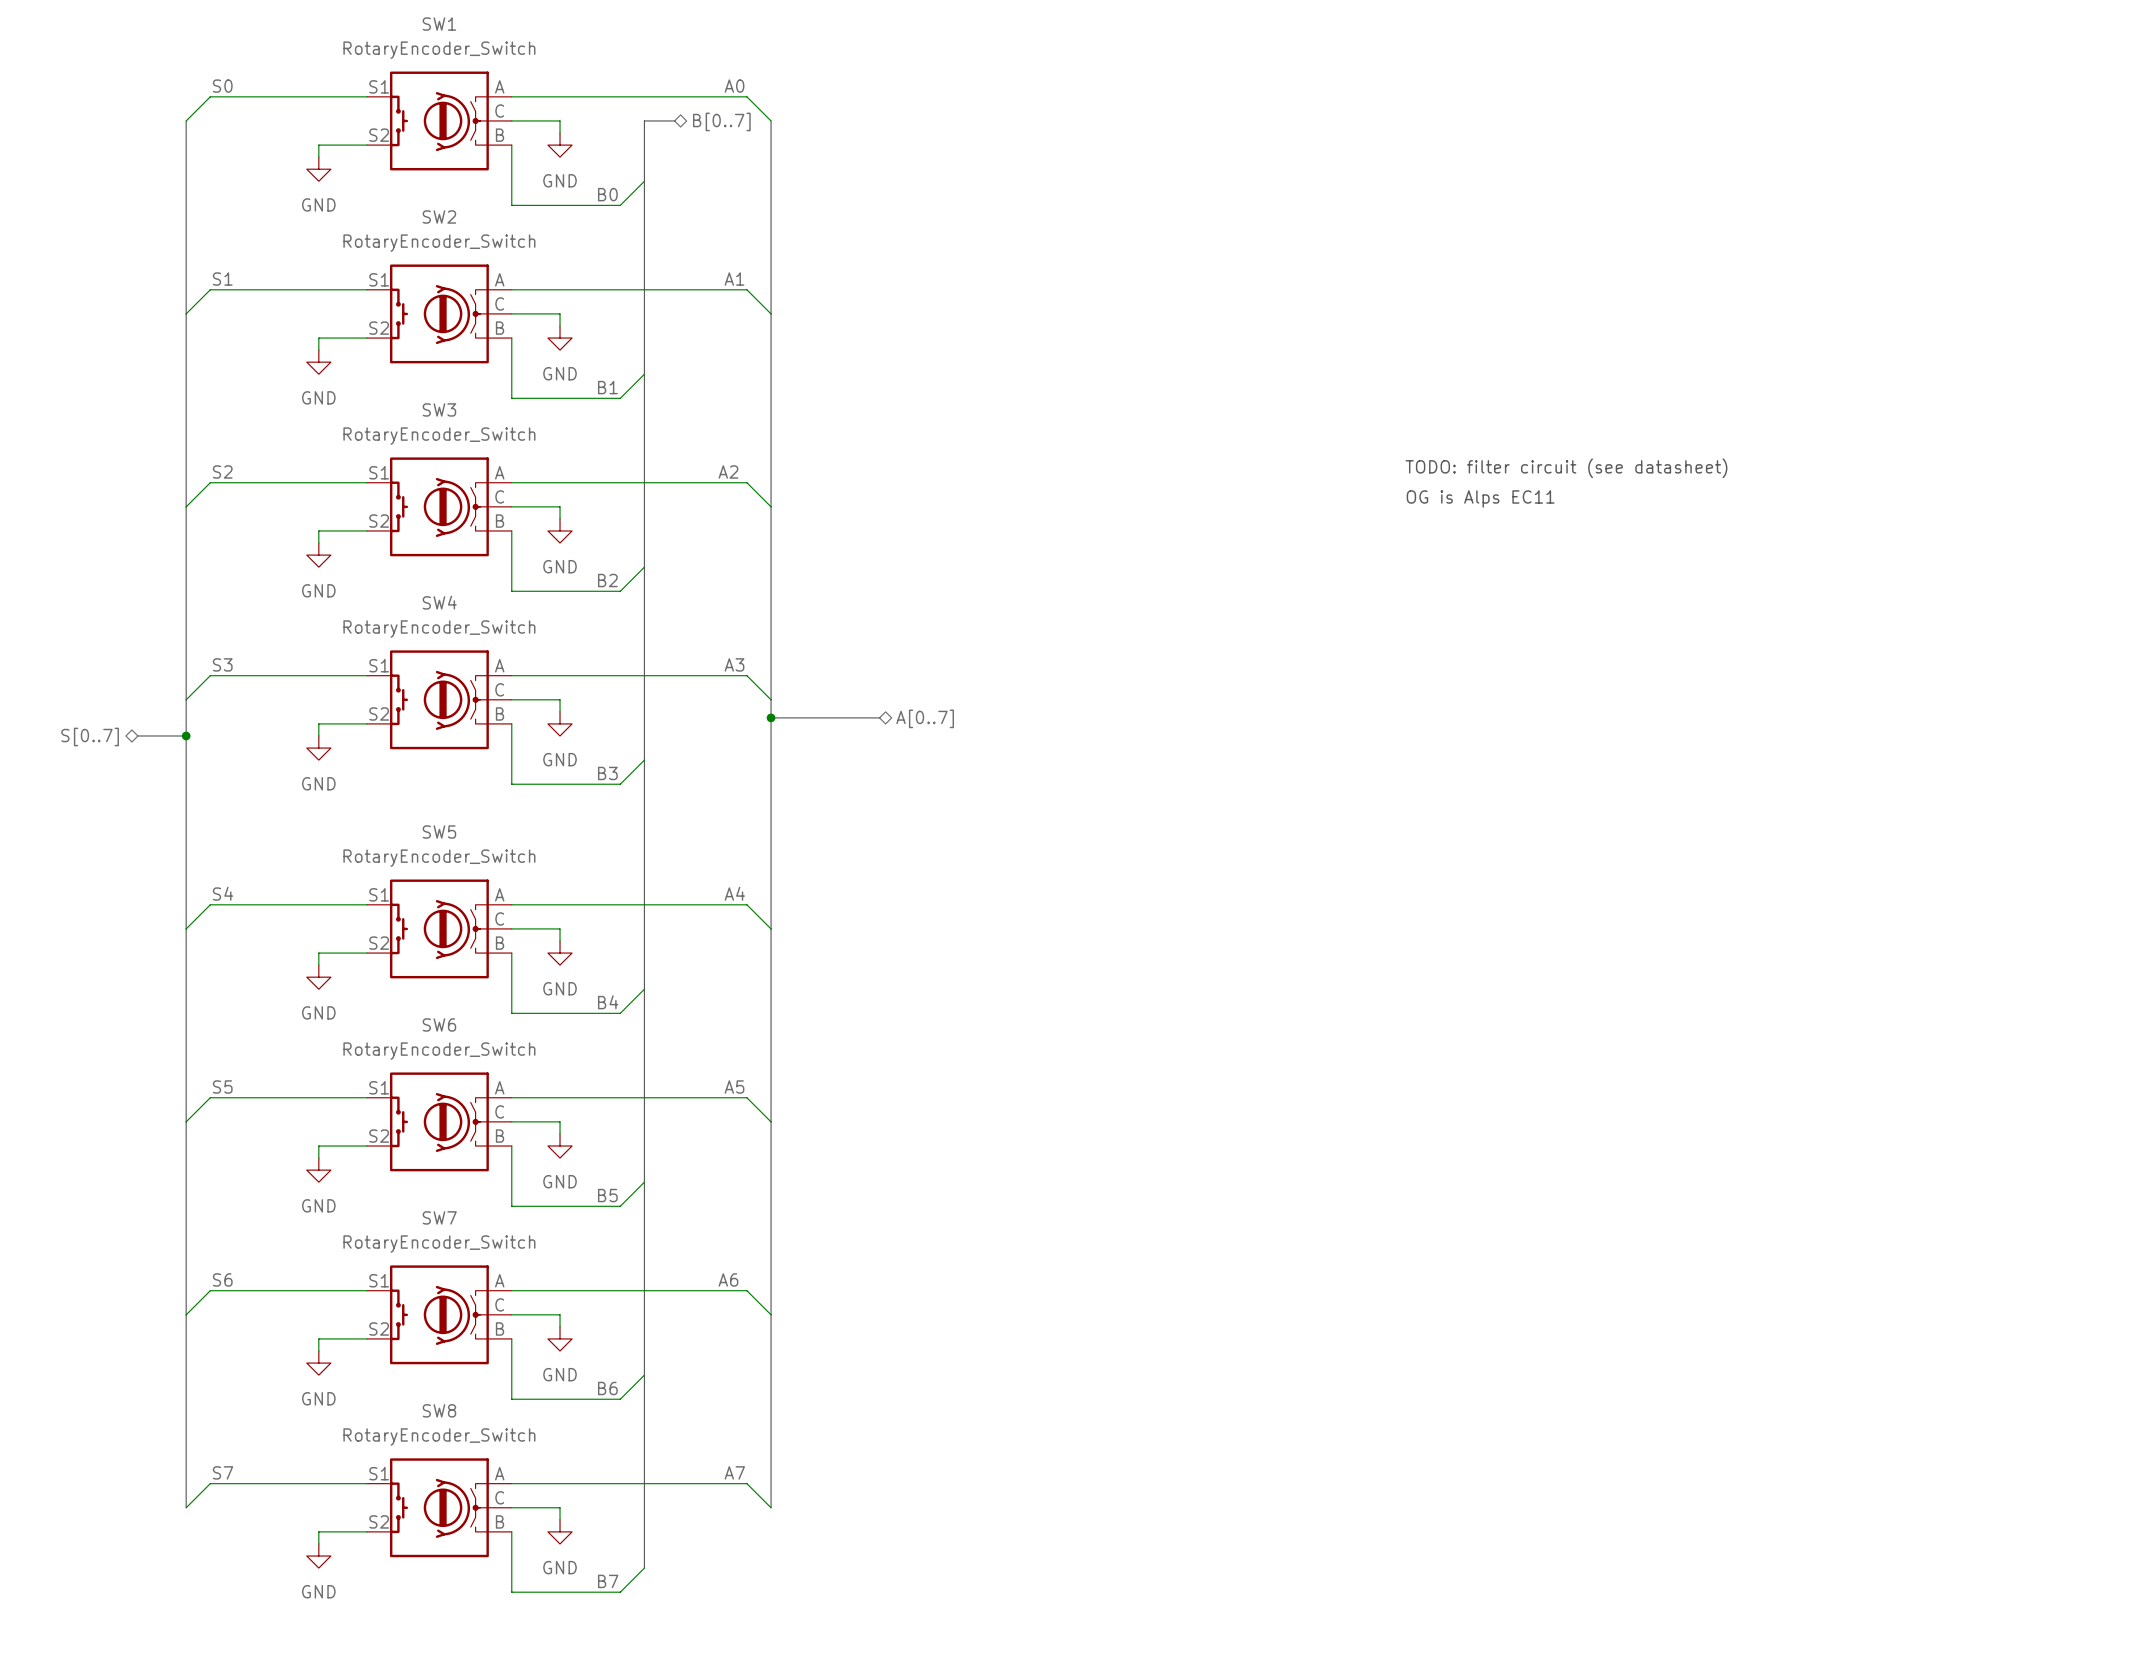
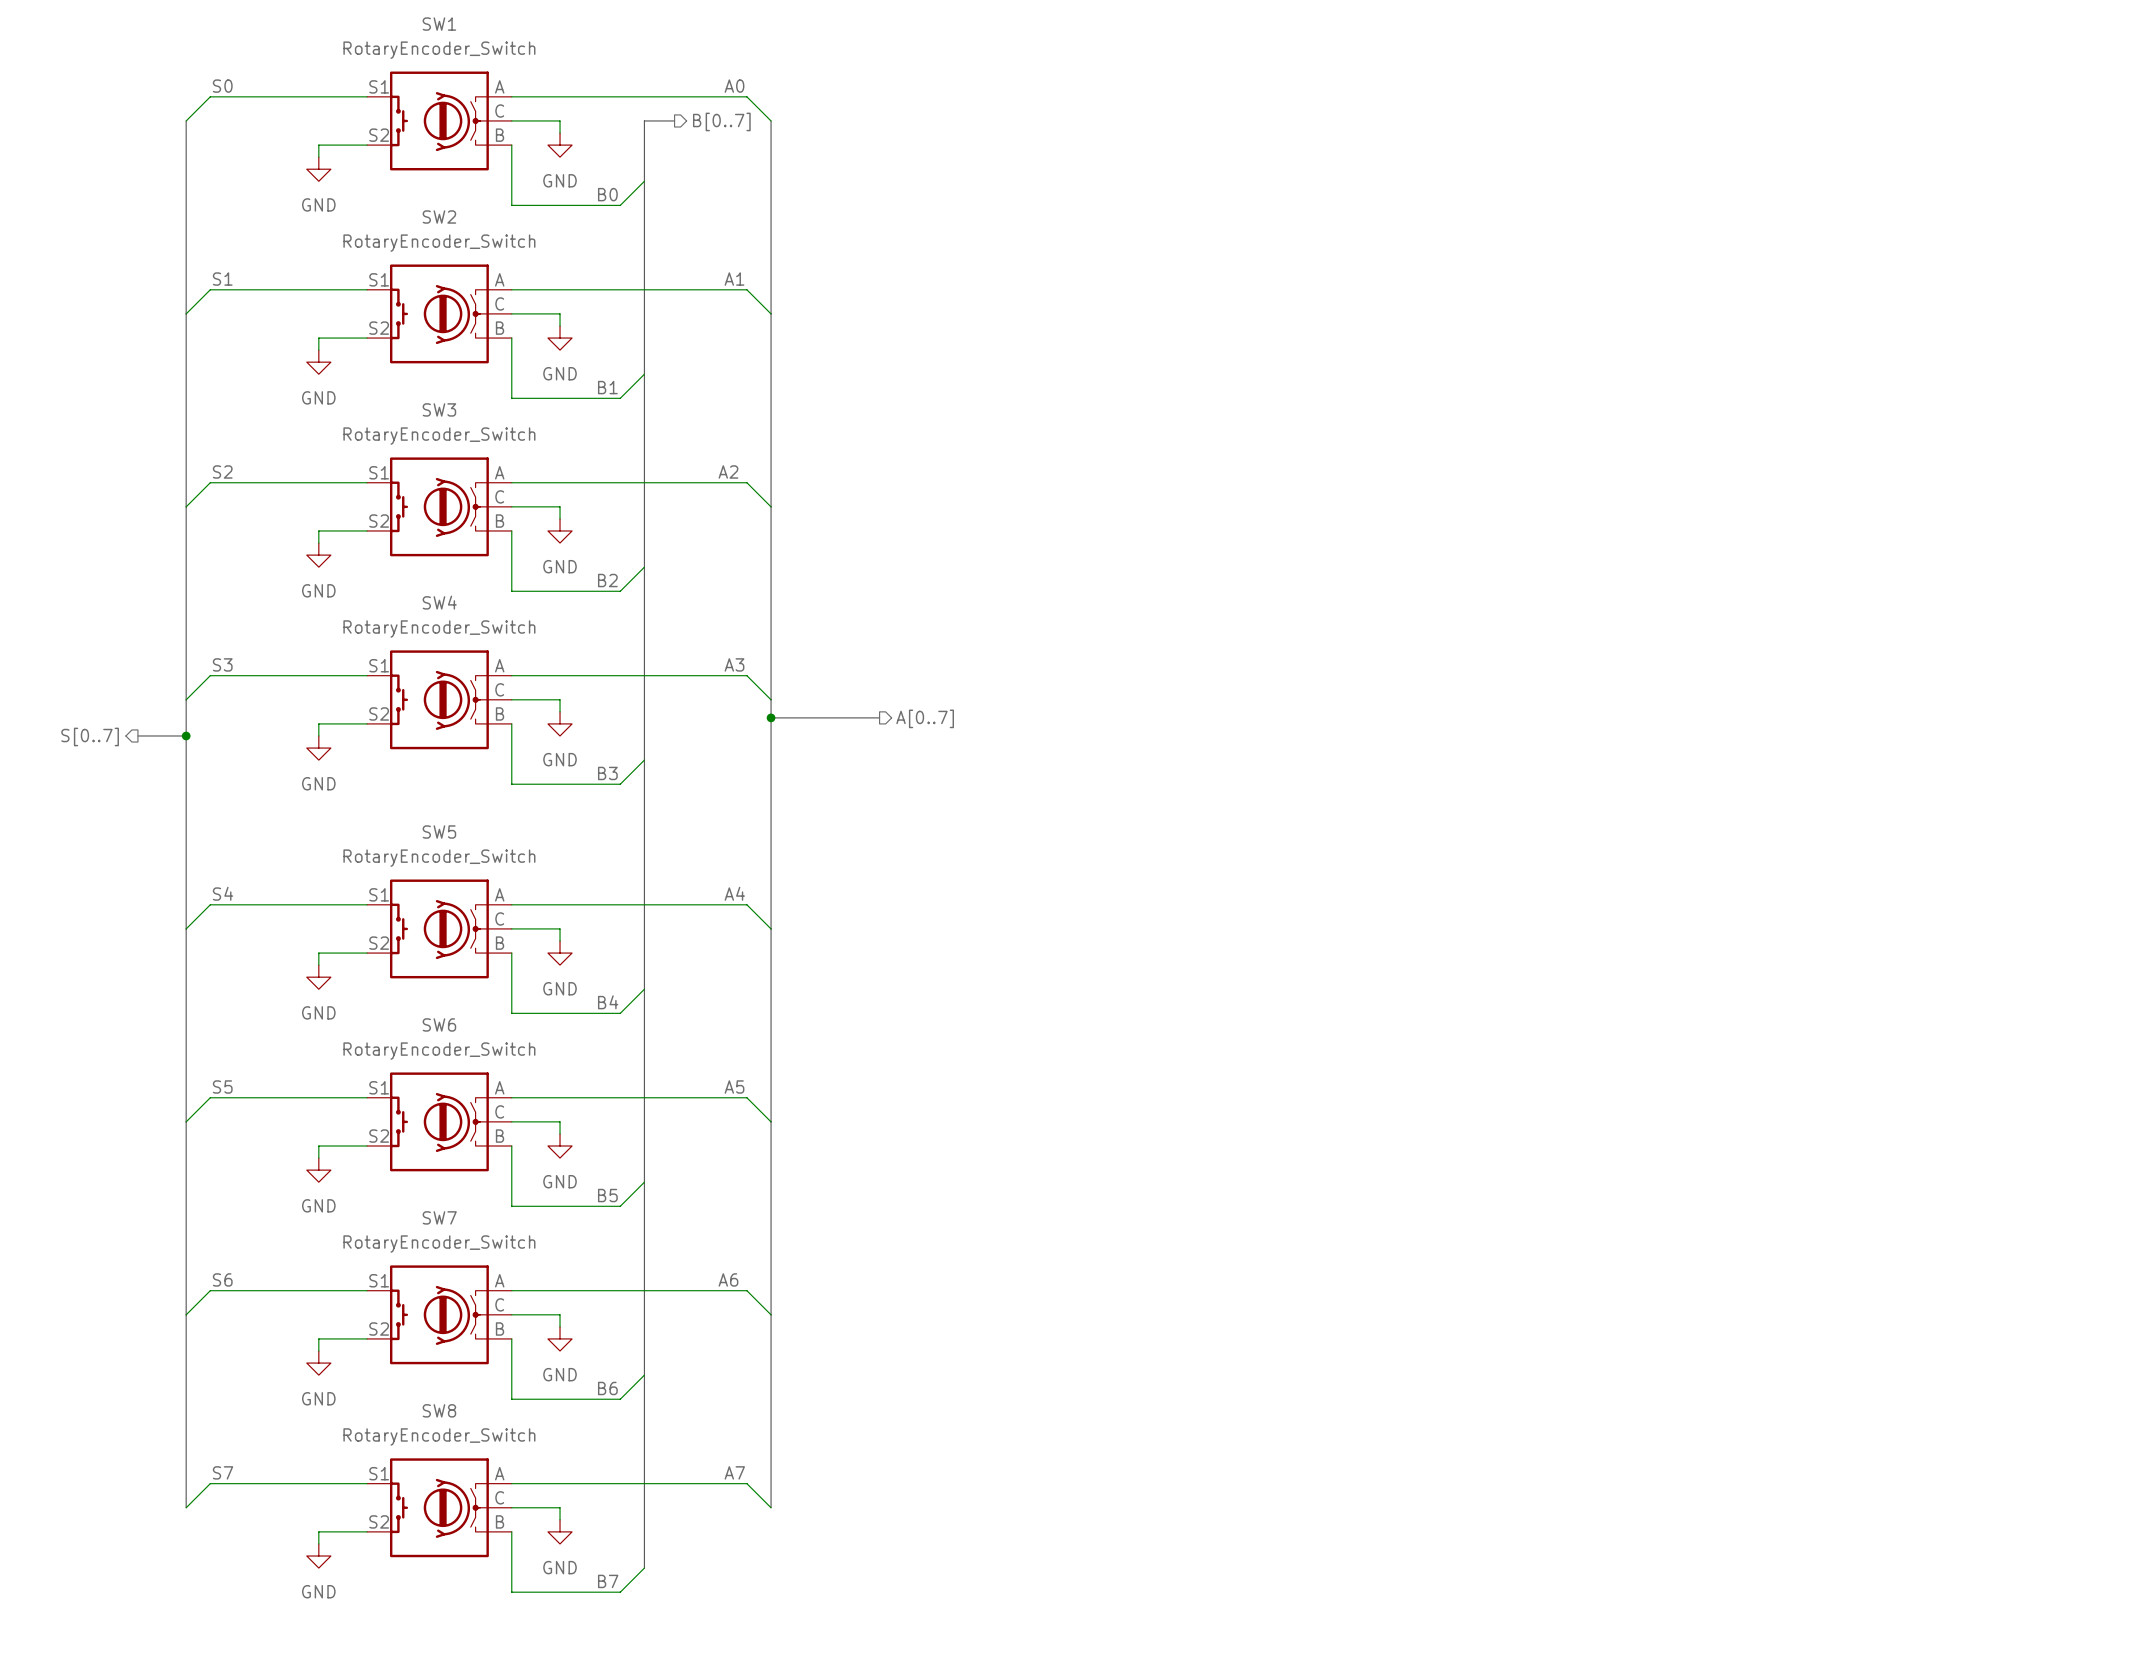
hierarchical label shape: bidirectional (721, 121) -> output (721, 121)
text: TODO: filter circuit (see datasheet) (1566, 468) -> none
text: OG is Alps EC11 (1480, 498) -> none
hierarchical label shape: bidirectional (925, 718) -> output (925, 718)
hierarchical label shape: bidirectional (90, 736) -> output (90, 736)

